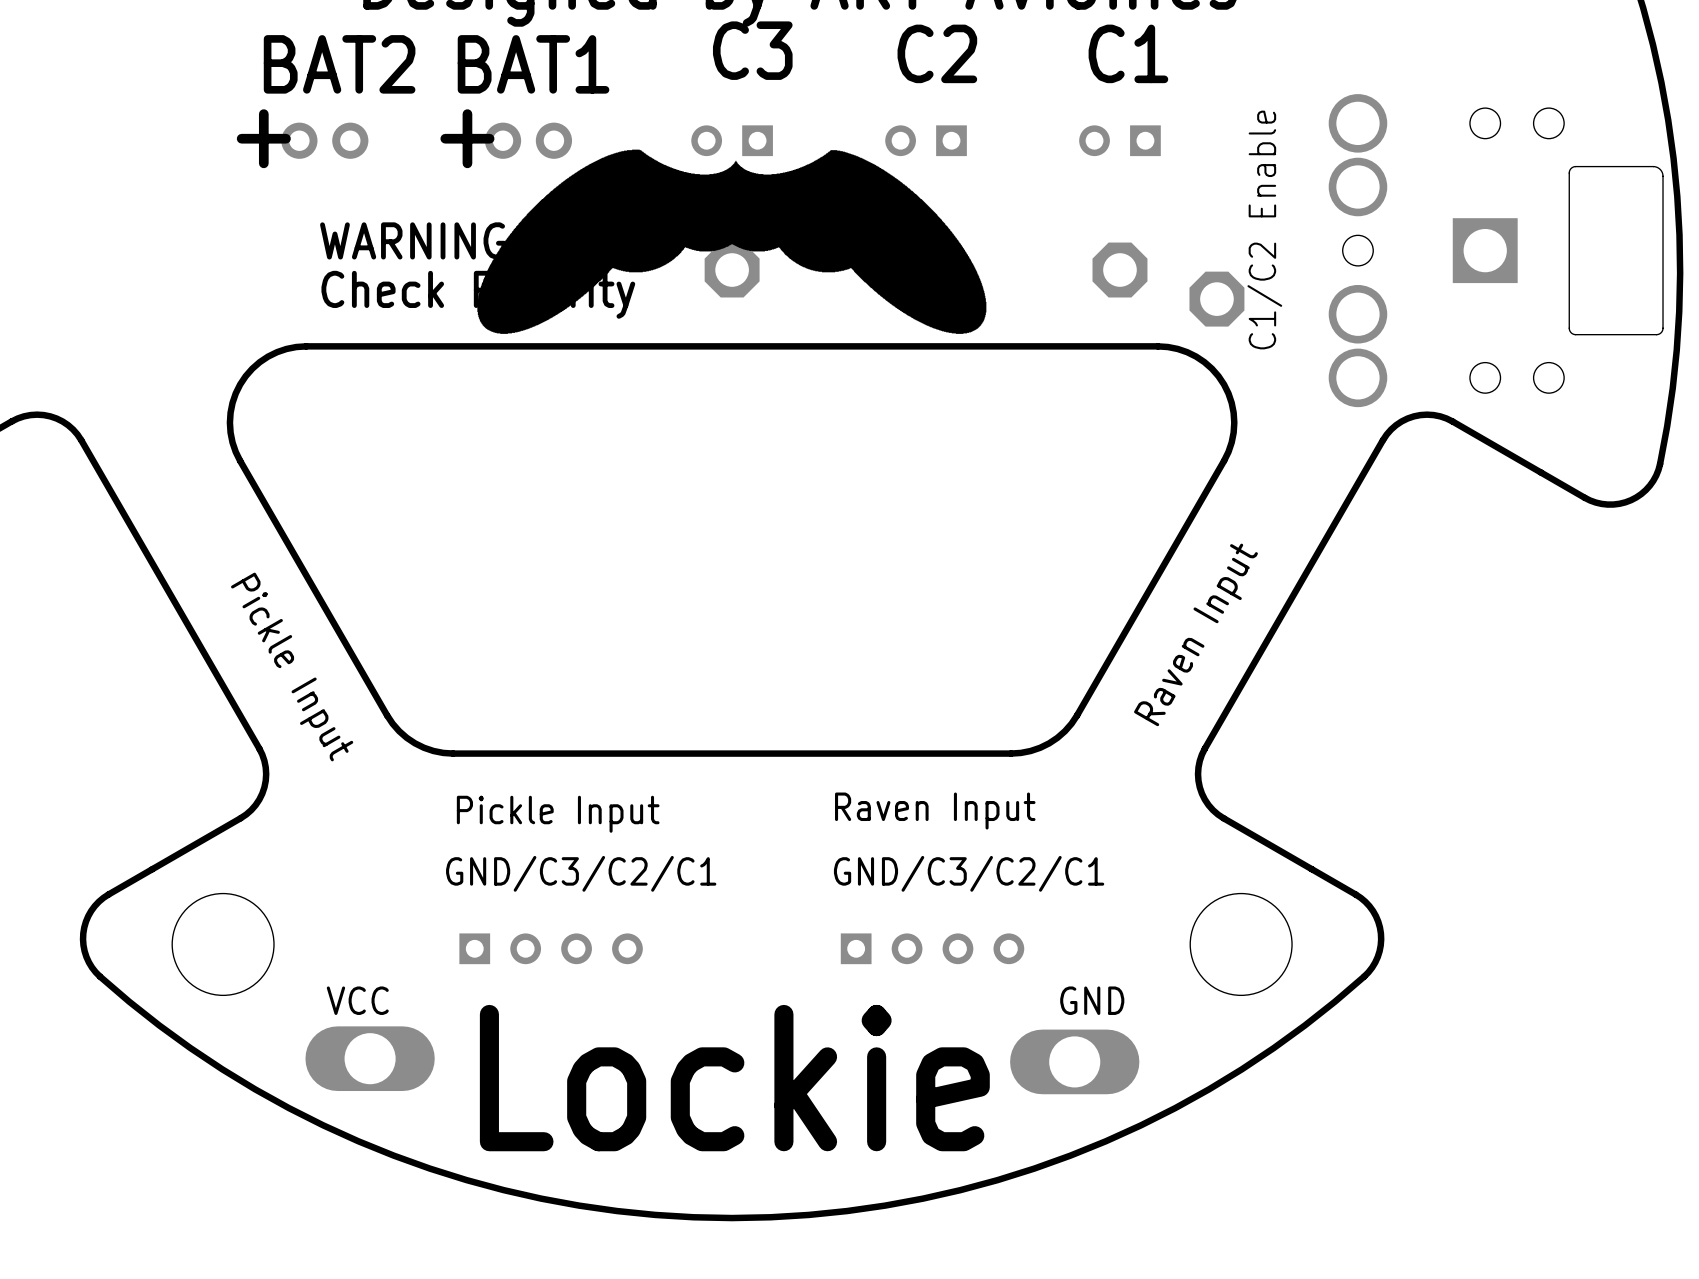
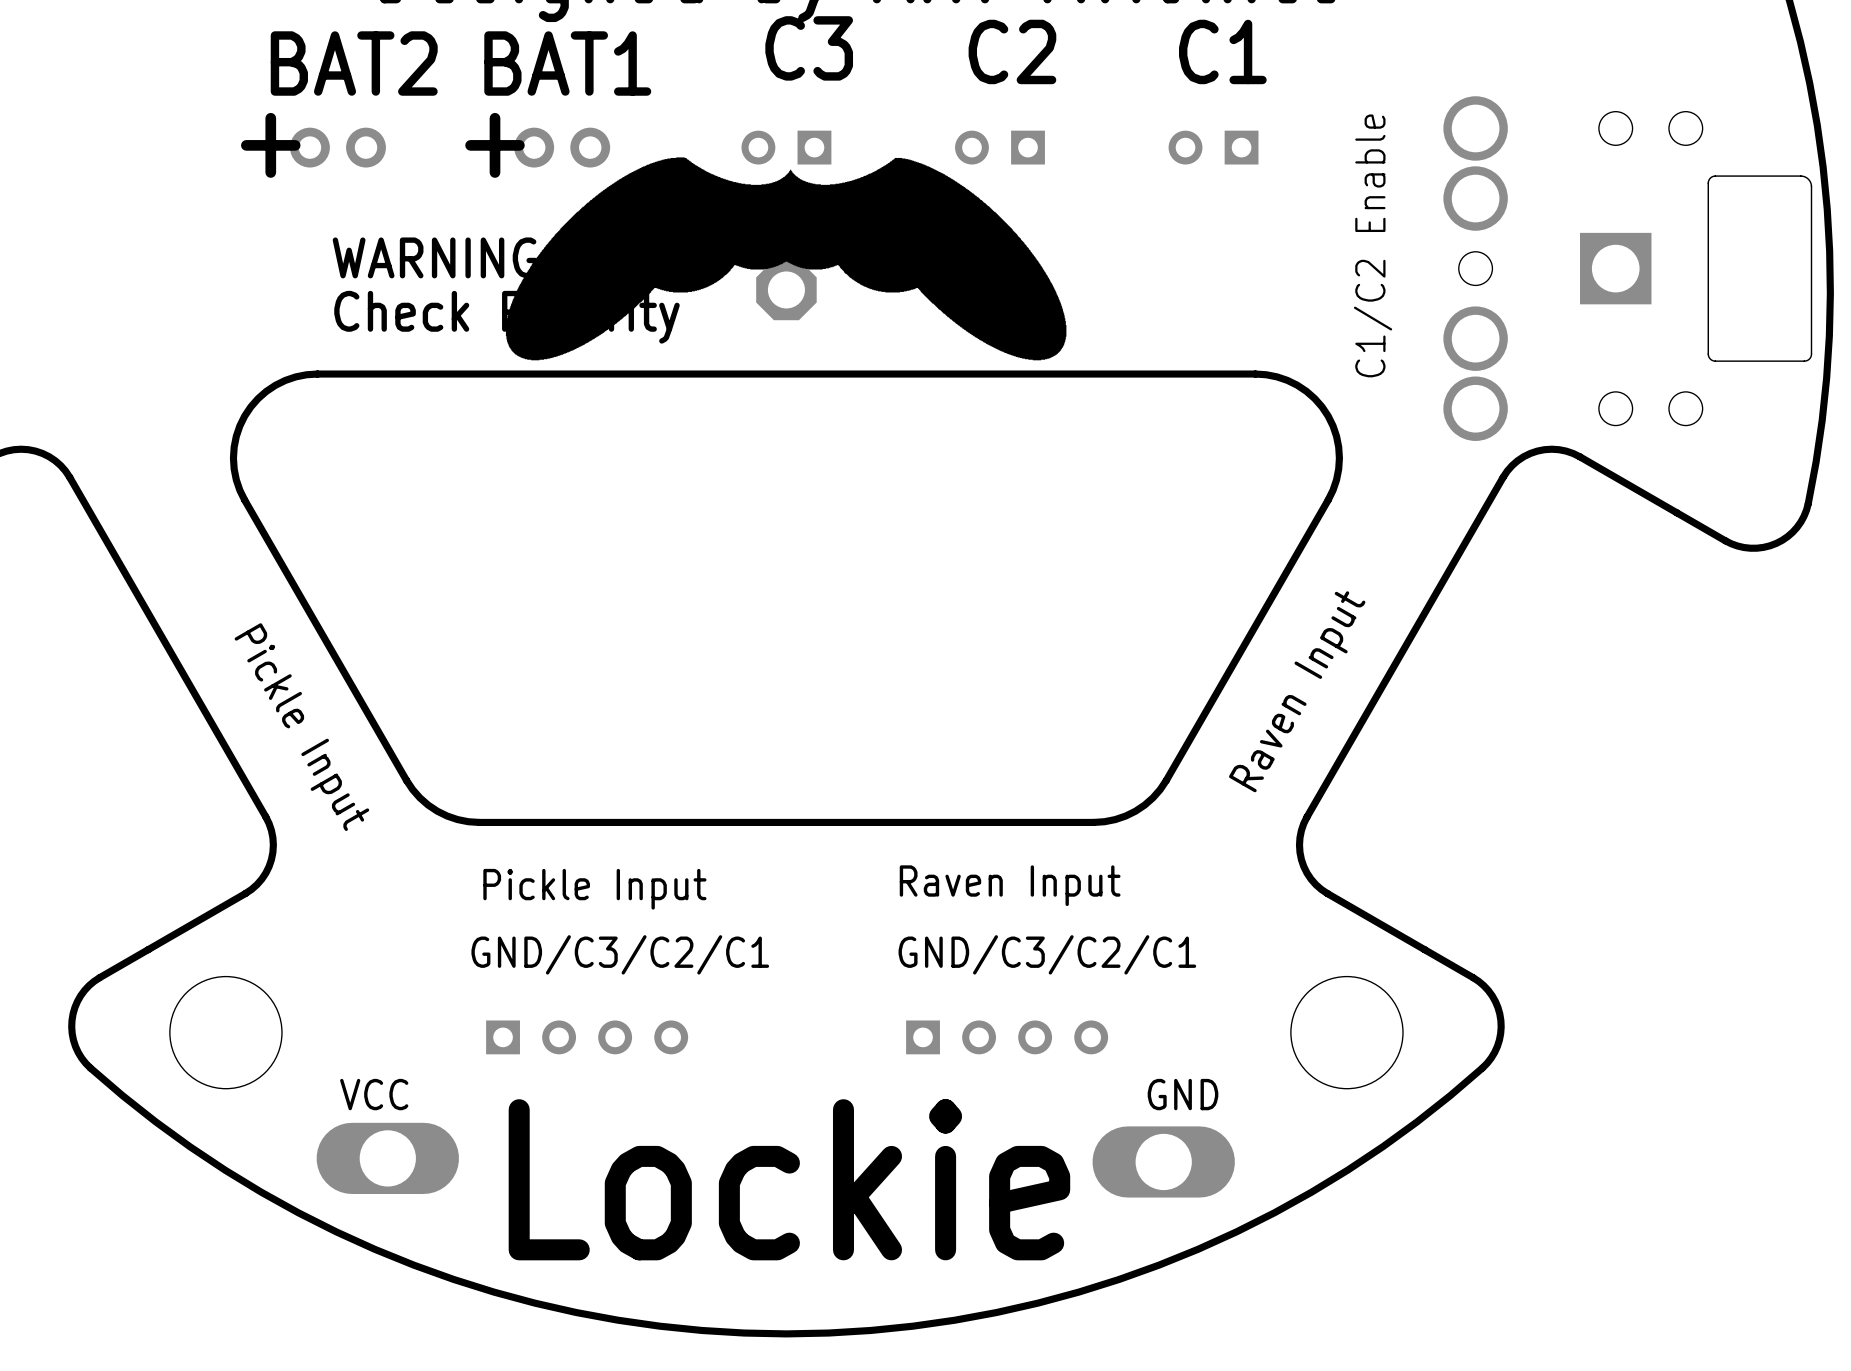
part: (1119, 270) -> none
part: (1216, 299) -> none

